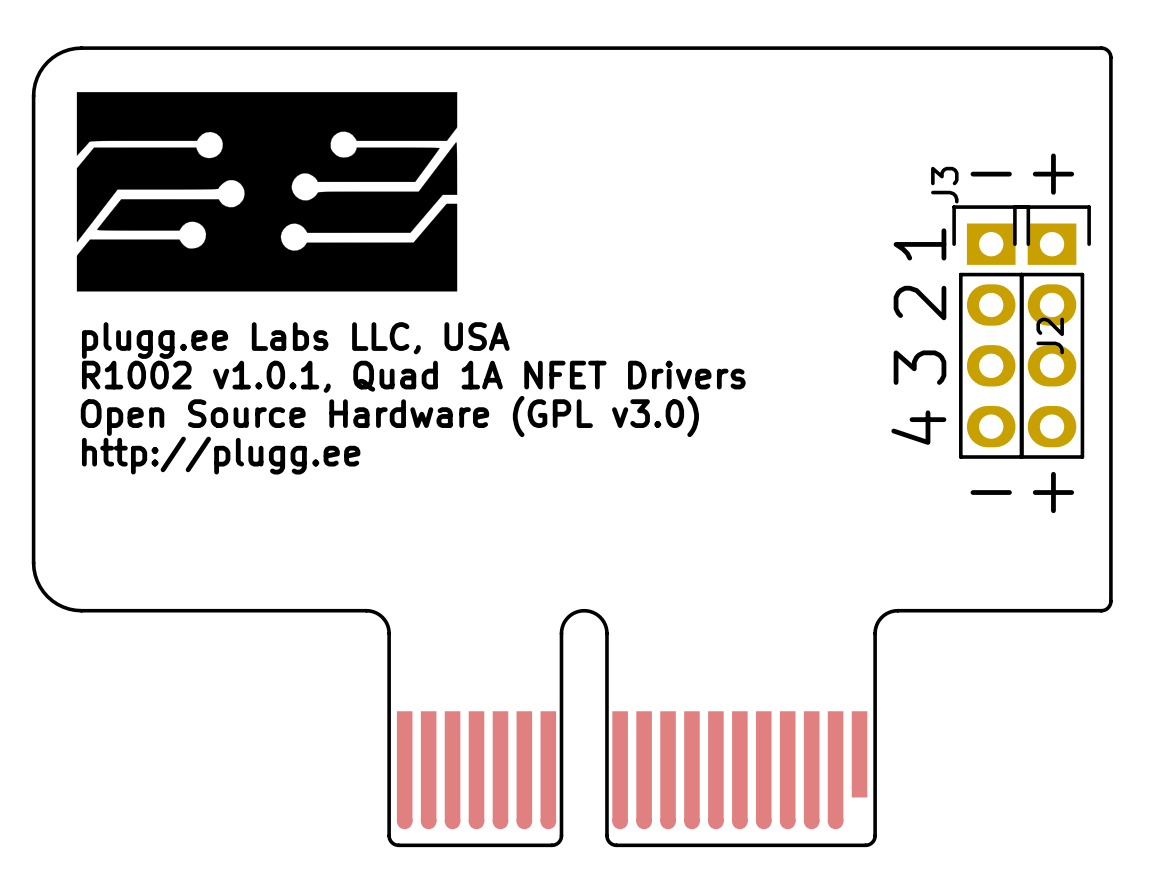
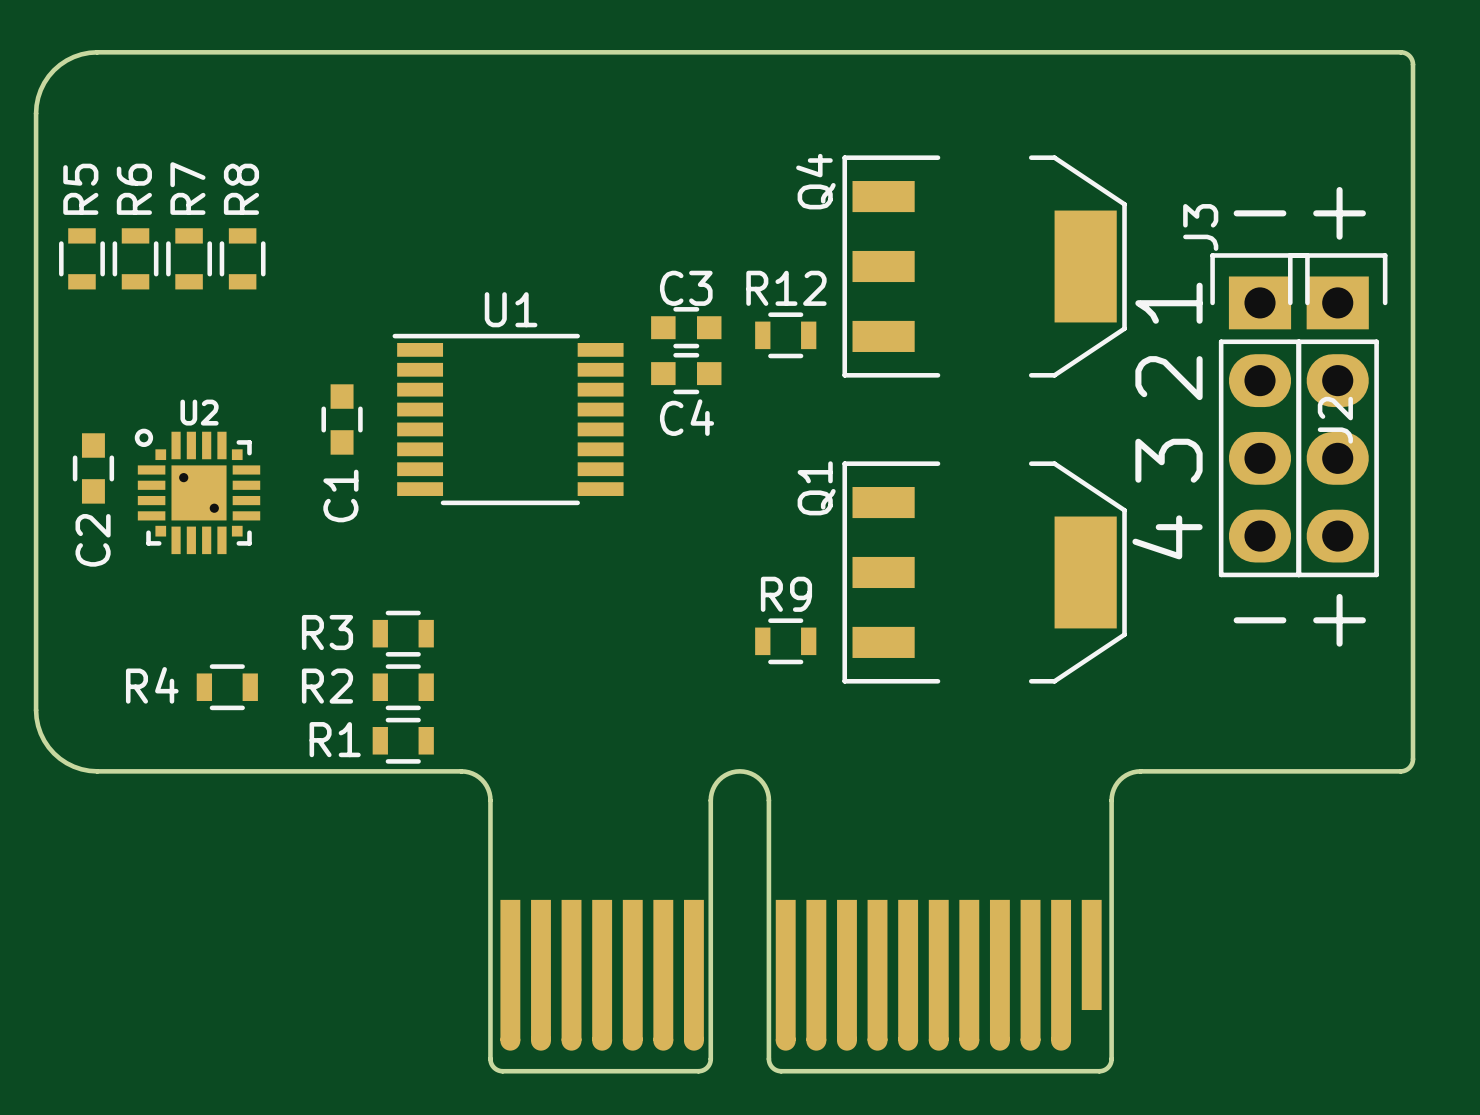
drawing: [76, 92, 458, 292] -> none
R5: none -> (81, 258)
R6: none -> (135, 258)
R7: none -> (189, 258)
R8: none -> (242, 258)
Q4: none -> (984, 266)
C3: none -> (686, 327)
R12: none -> (785, 335)
C4: none -> (686, 373)
C1: none -> (342, 419)
U1: none -> (508, 419)
text: plugg.ee Labs LLC, USA (295, 340) -> none
C2: none -> (93, 468)
text: R1002 v1.0.1, Quad 1A NFET Drivers (413, 376) -> none
U2: none -> (197, 491)
text: Open Source Hardware (GPL v3.0) (389, 416) -> none
text: http://plugg.ee (221, 455) -> none
Q1: none -> (984, 572)
R3: none -> (403, 633)
R9: none -> (785, 641)
R4: none -> (227, 687)
R2: none -> (403, 687)
R1: none -> (403, 740)

